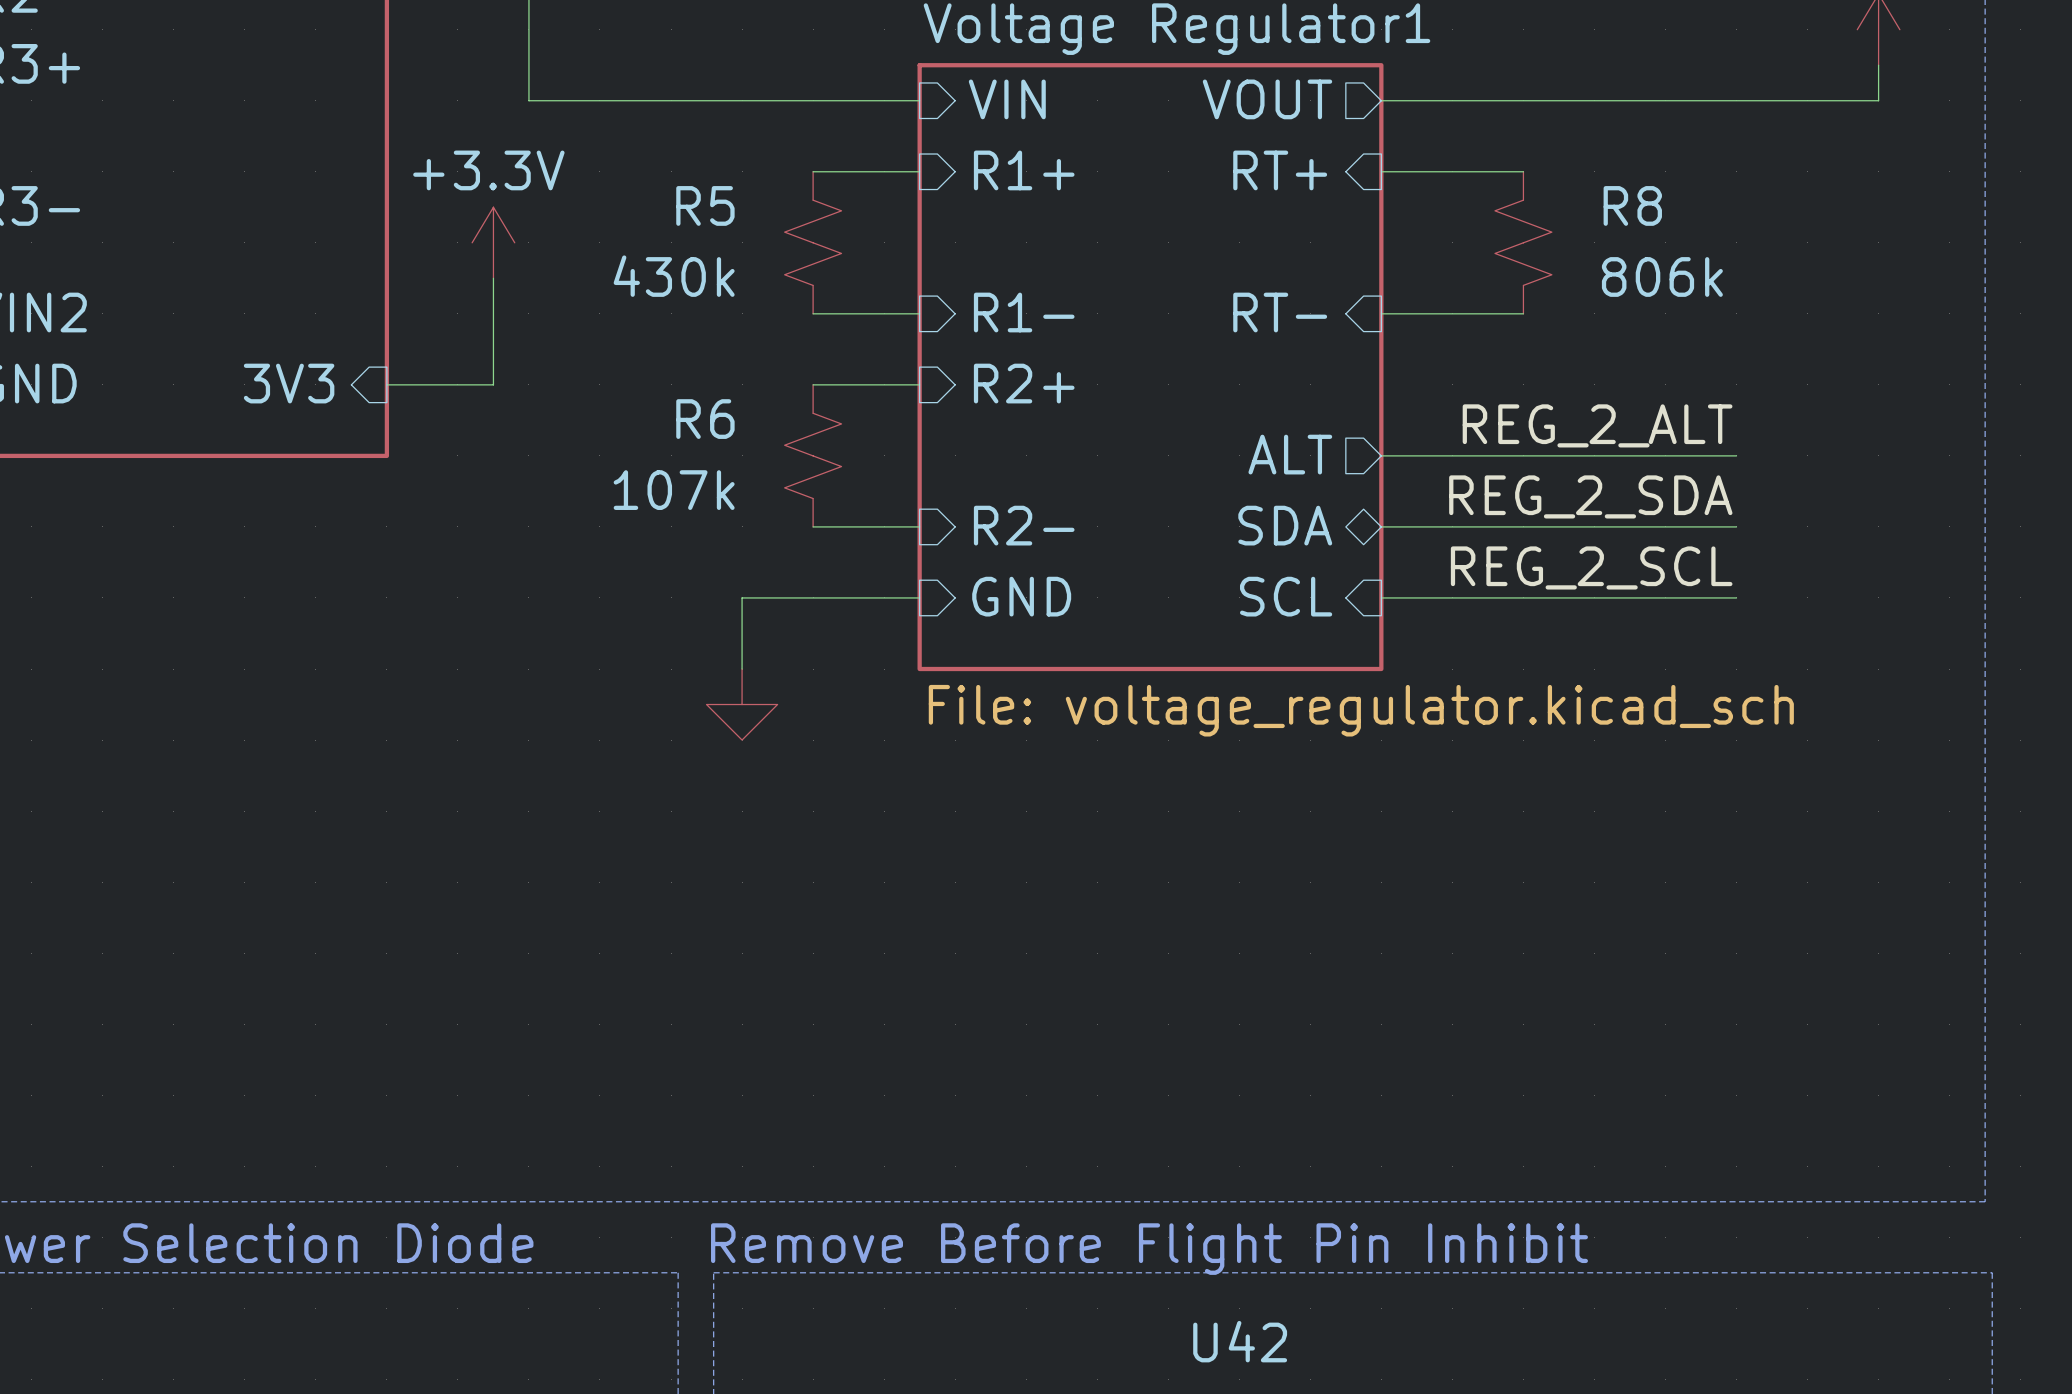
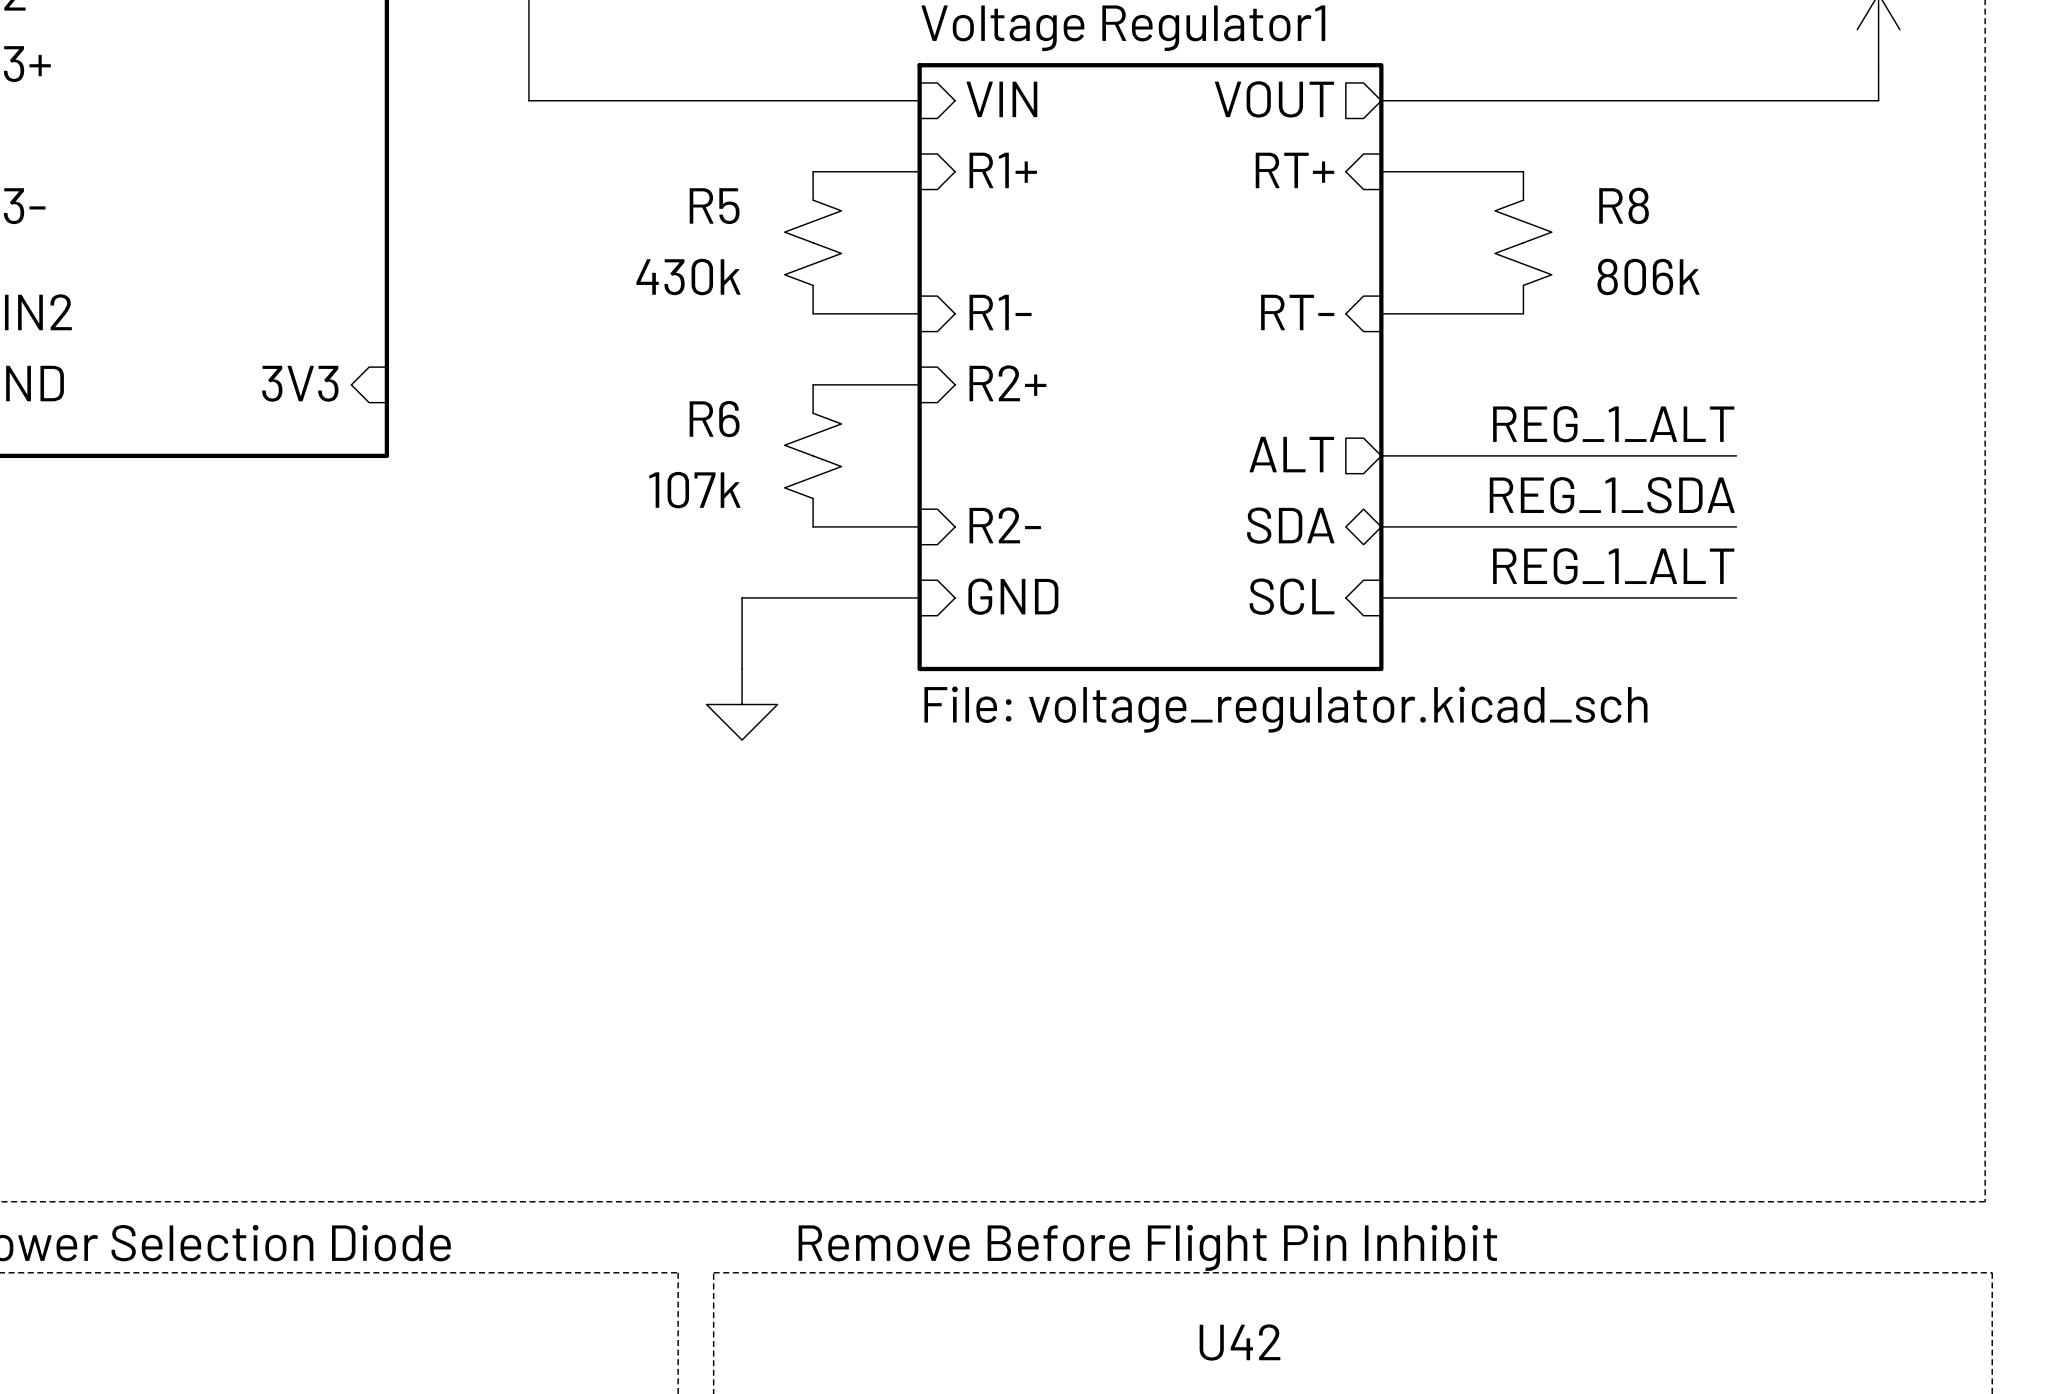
power symbol: +3.3V (493, 242) -> none
wire: (493, 278) (493, 384) (386, 384) -> none
label: REG_2_ALT (1597, 425) -> REG_1_ALT (1613, 424)
label: REG_2_SDA (1590, 496) -> REG_1_SDA (1612, 495)
label: REG_2_SCL (1591, 567) -> REG_1_ALT (1613, 566)

